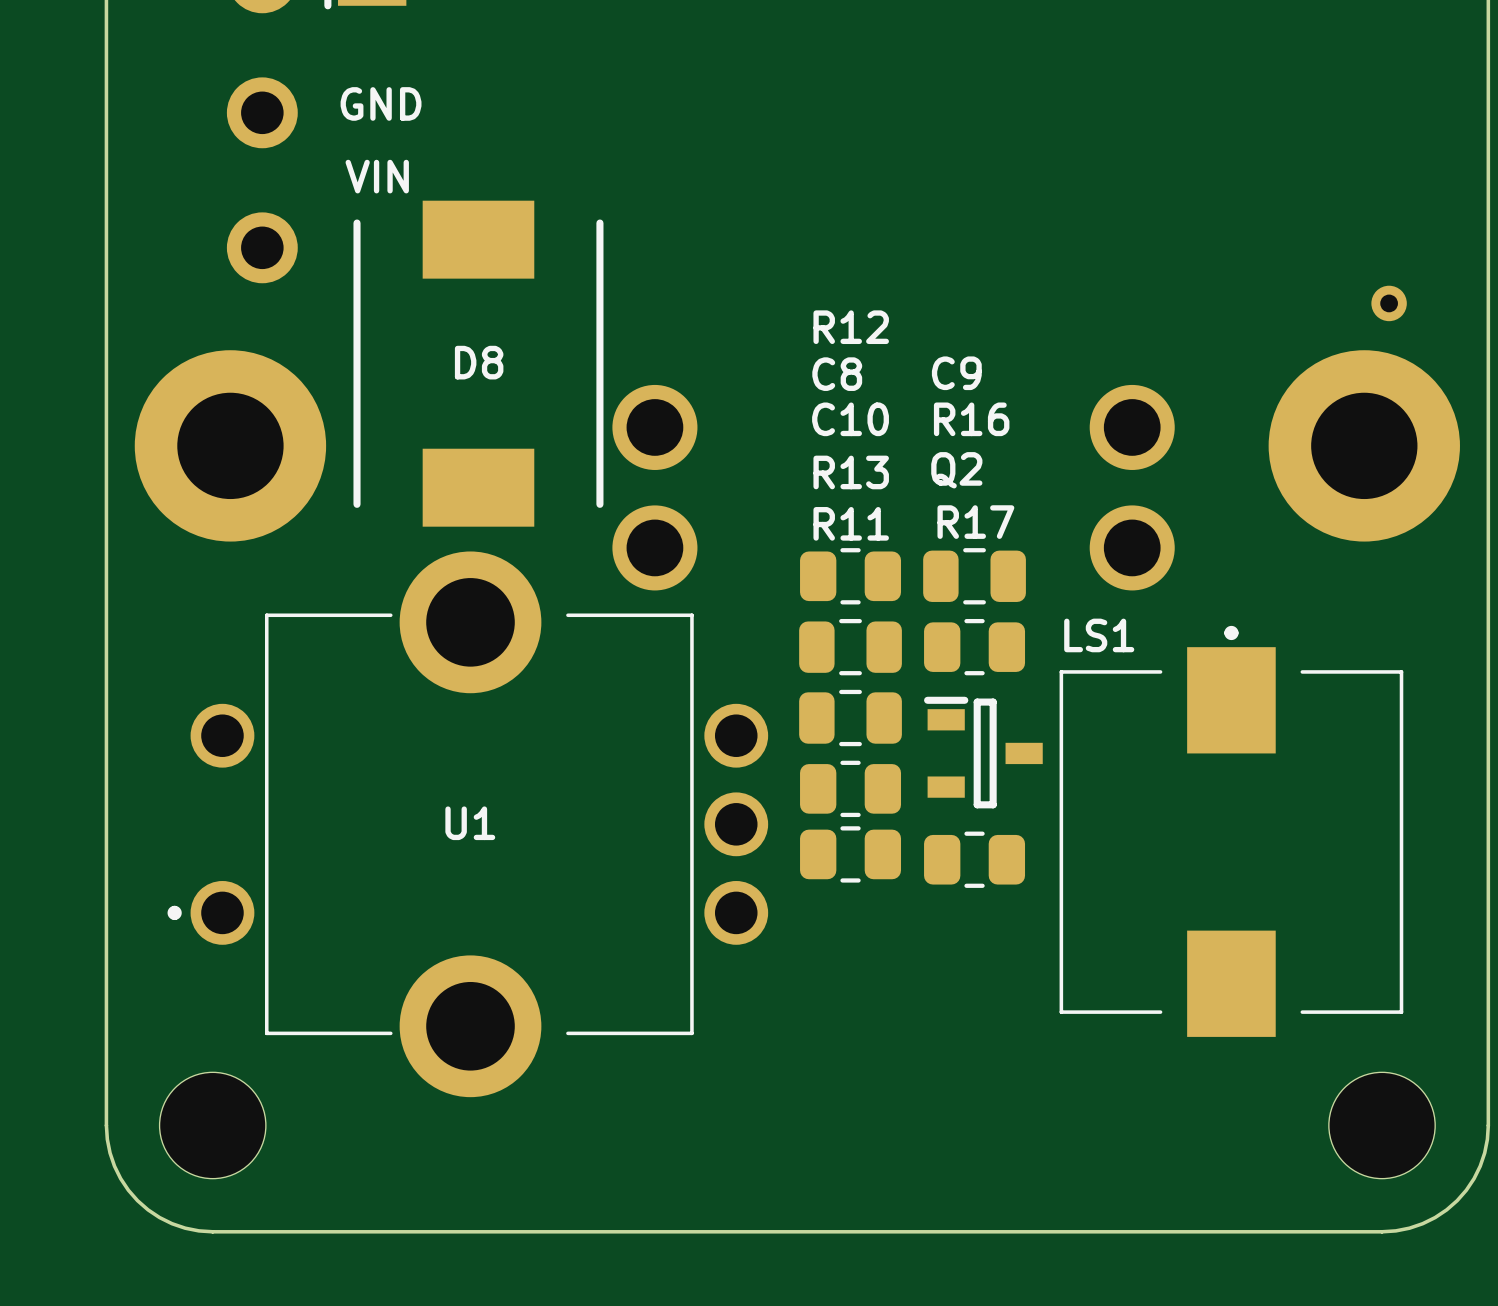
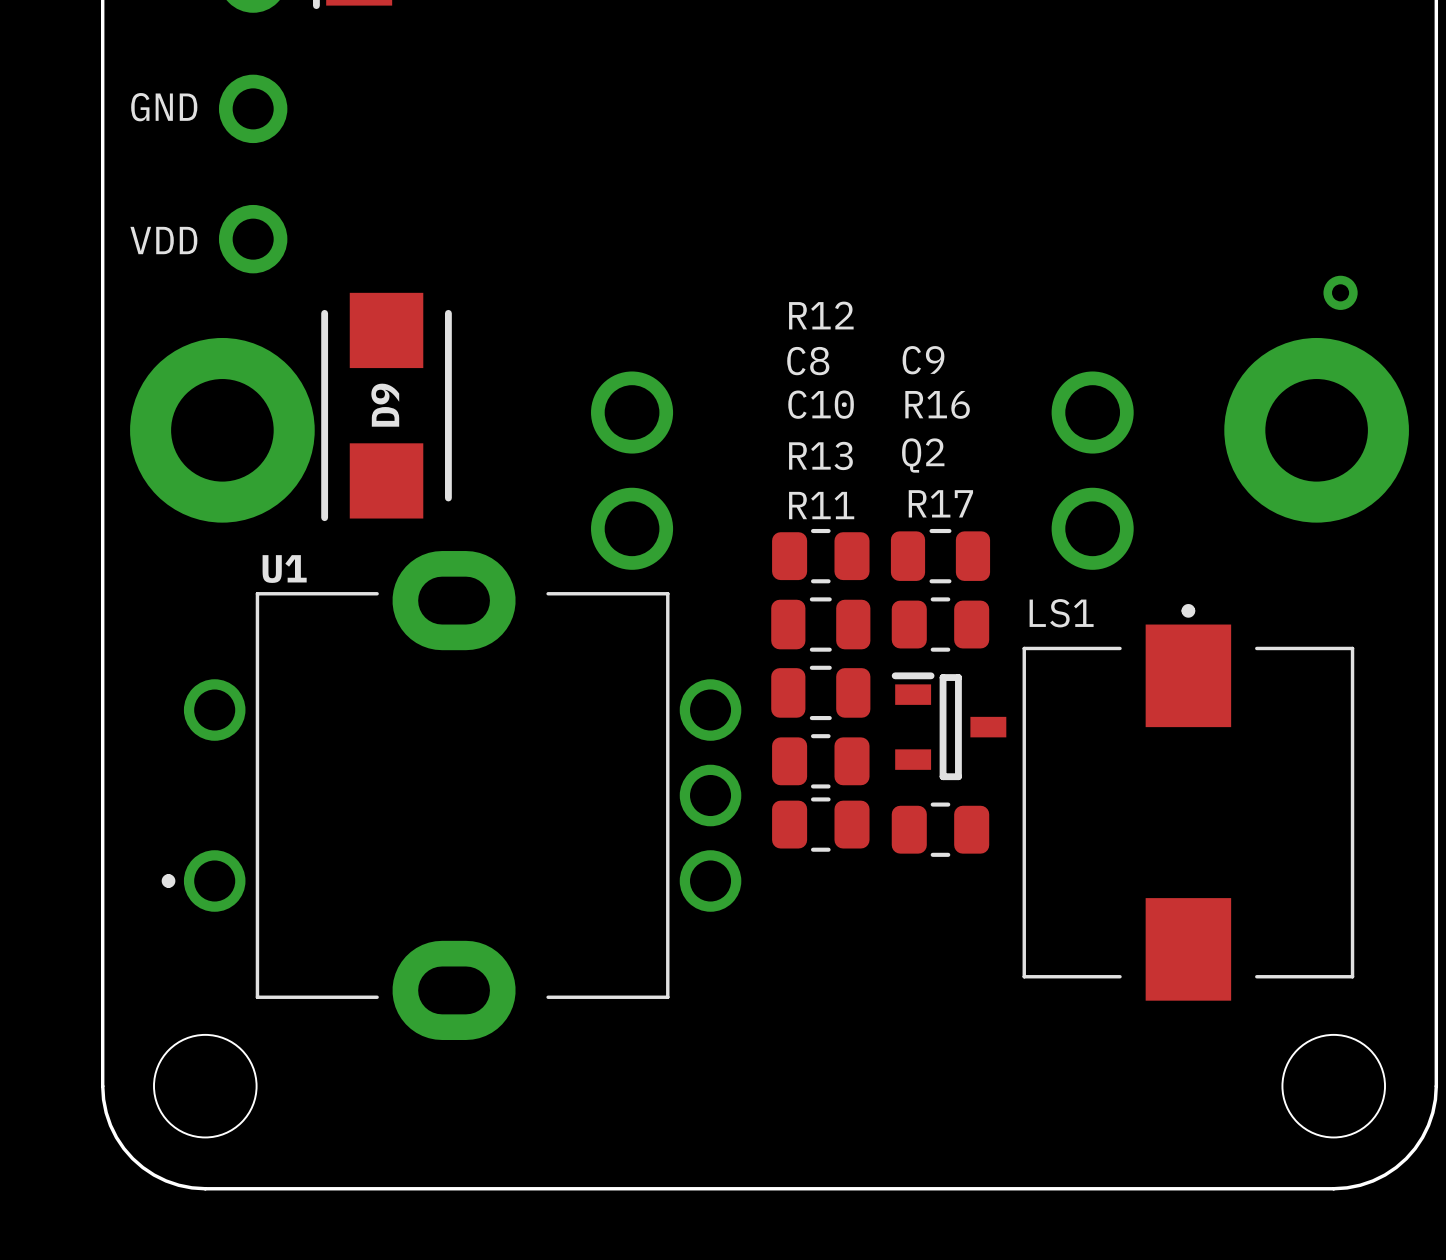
text position: GND (381, 103) -> GND (164, 107)
text: VIN (377, 176) -> none
text: none -> VDD (163, 240)
D8: (478, 363) -> none
D9: none -> (386, 406)
U1 footprint: [167, 551, 769, 1098] -> [161, 551, 742, 1041]
U1 name position: U1 (470, 823) -> U1 (284, 569)

